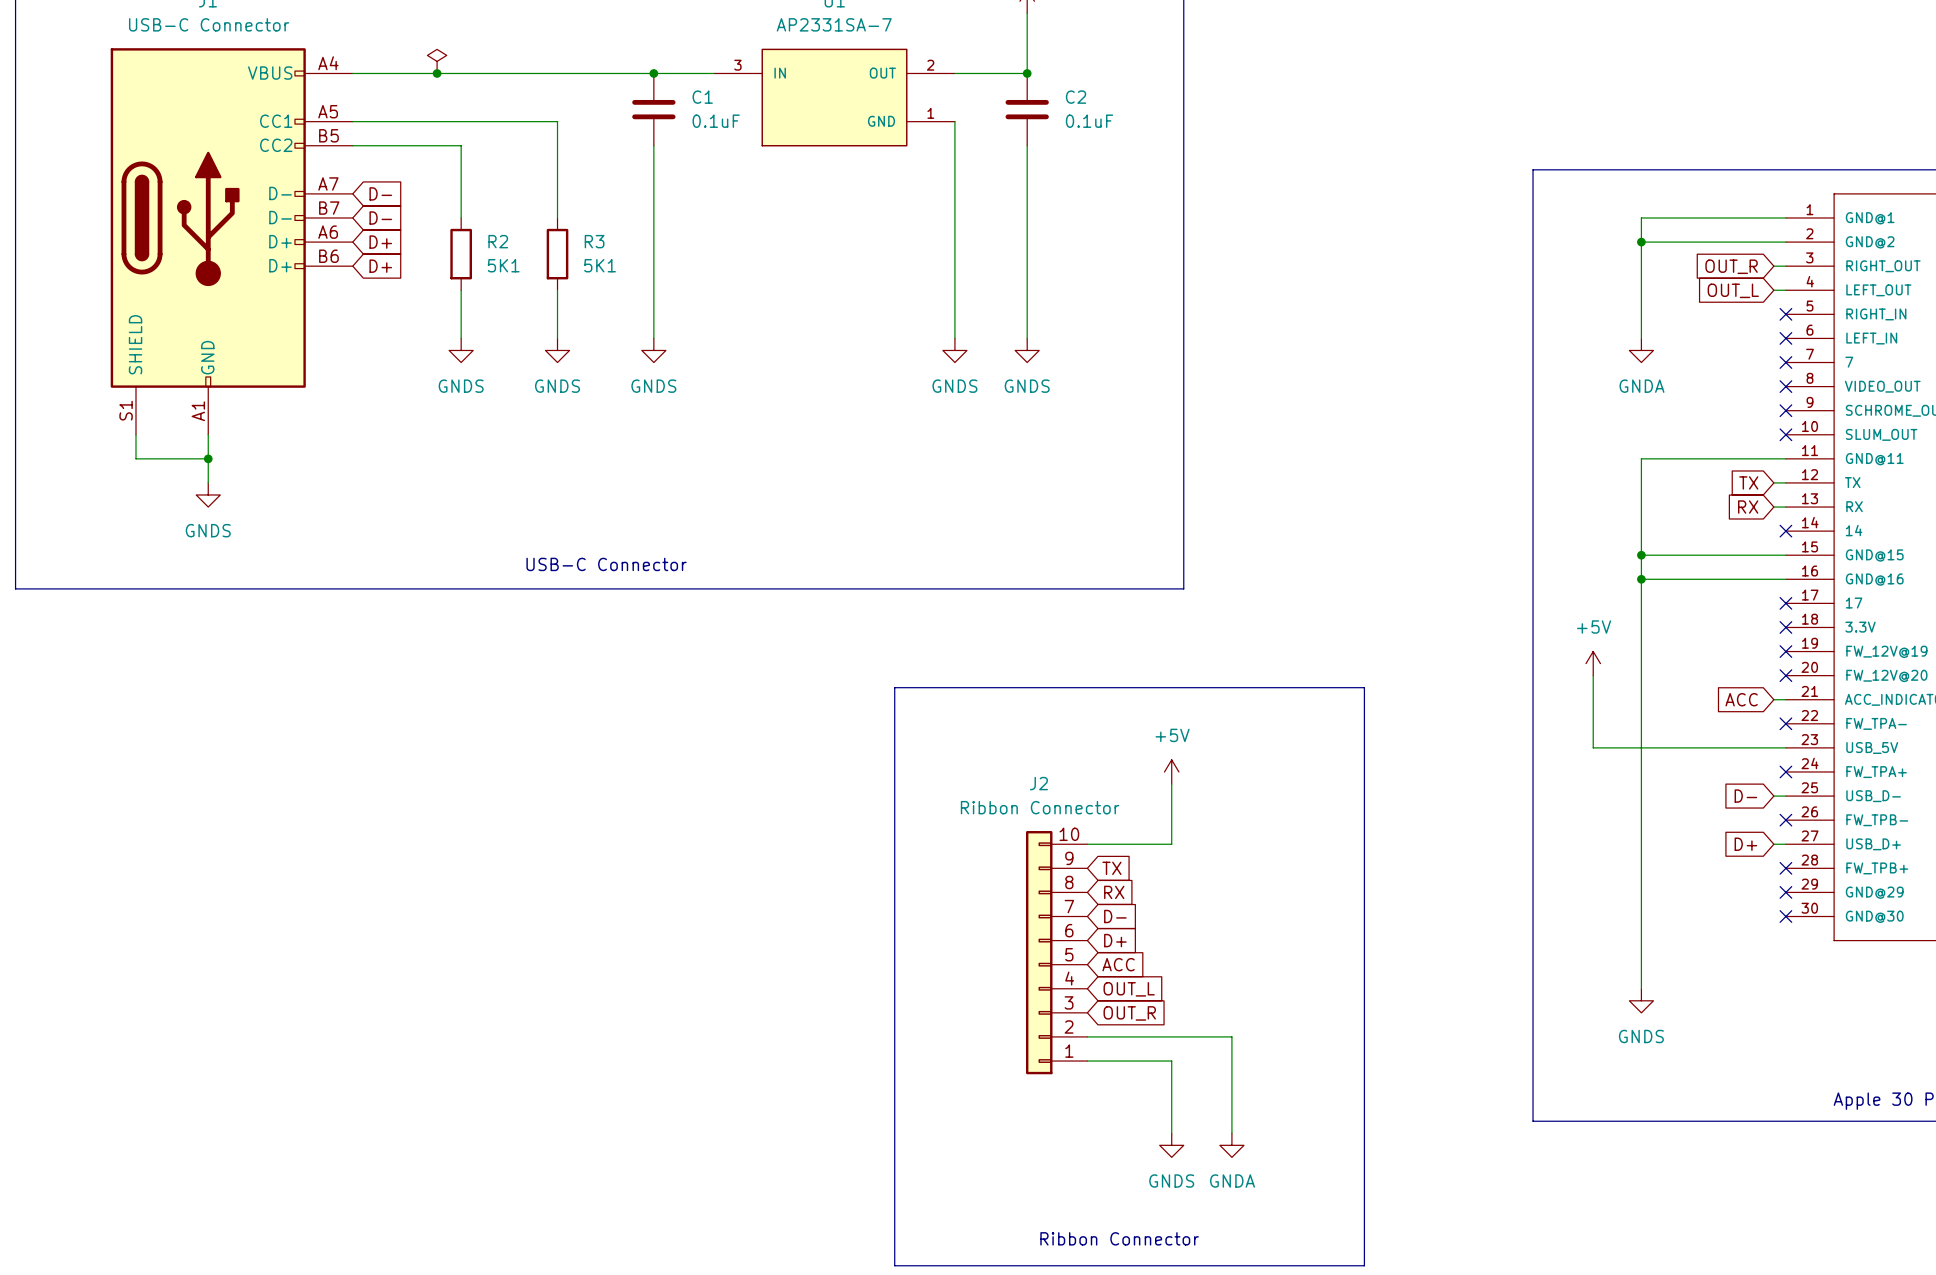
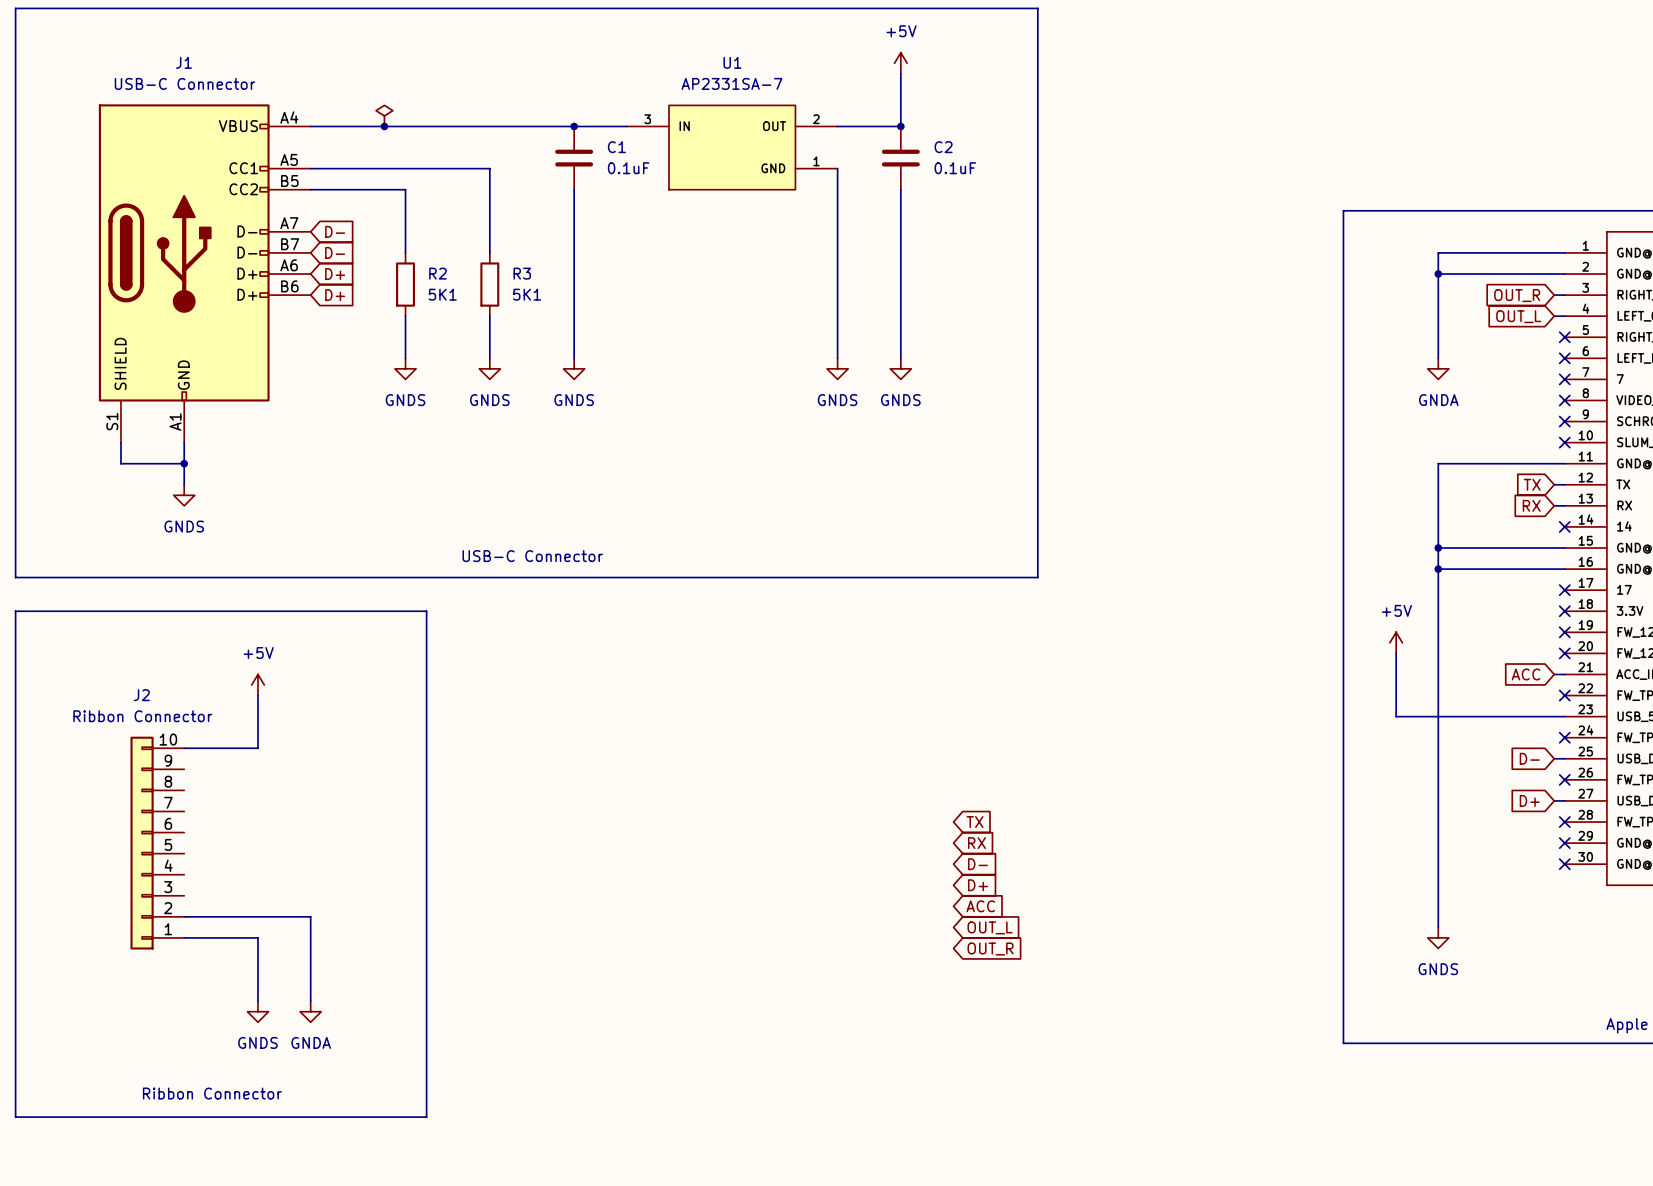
line: none -> (15, 611) (426, 611) (426, 1117) (15, 1117) (15, 611)
line: (894, 687) (1364, 687) (1364, 1265) (894, 1265) (894, 687) -> none
power symbol: none -> +5V (257, 685)
wire: none -> (257, 695) (257, 748) (184, 748)
power symbol: +5V (1171, 771) -> none
wire: (1171, 784) (1171, 844) (1087, 844) -> none
J2 position: (1056, 952) -> (157, 843)
wire: none -> (184, 916) (310, 916) (310, 1001)
wire: none -> (184, 937) (257, 937) (257, 1001)
wire: (1087, 1036) (1231, 1036) (1231, 1133) -> none
wire: (1087, 1061) (1171, 1061) (1171, 1133) -> none
power symbol: none -> GNDS (257, 1011)
power symbol: none -> GNDA (310, 1011)
power symbol: GNDS (1171, 1145) -> none
power symbol: GNDA (1231, 1145) -> none
text: none -> Ribbon Connector (212, 1093)
text: Ribbon Connector (1119, 1238) -> none

